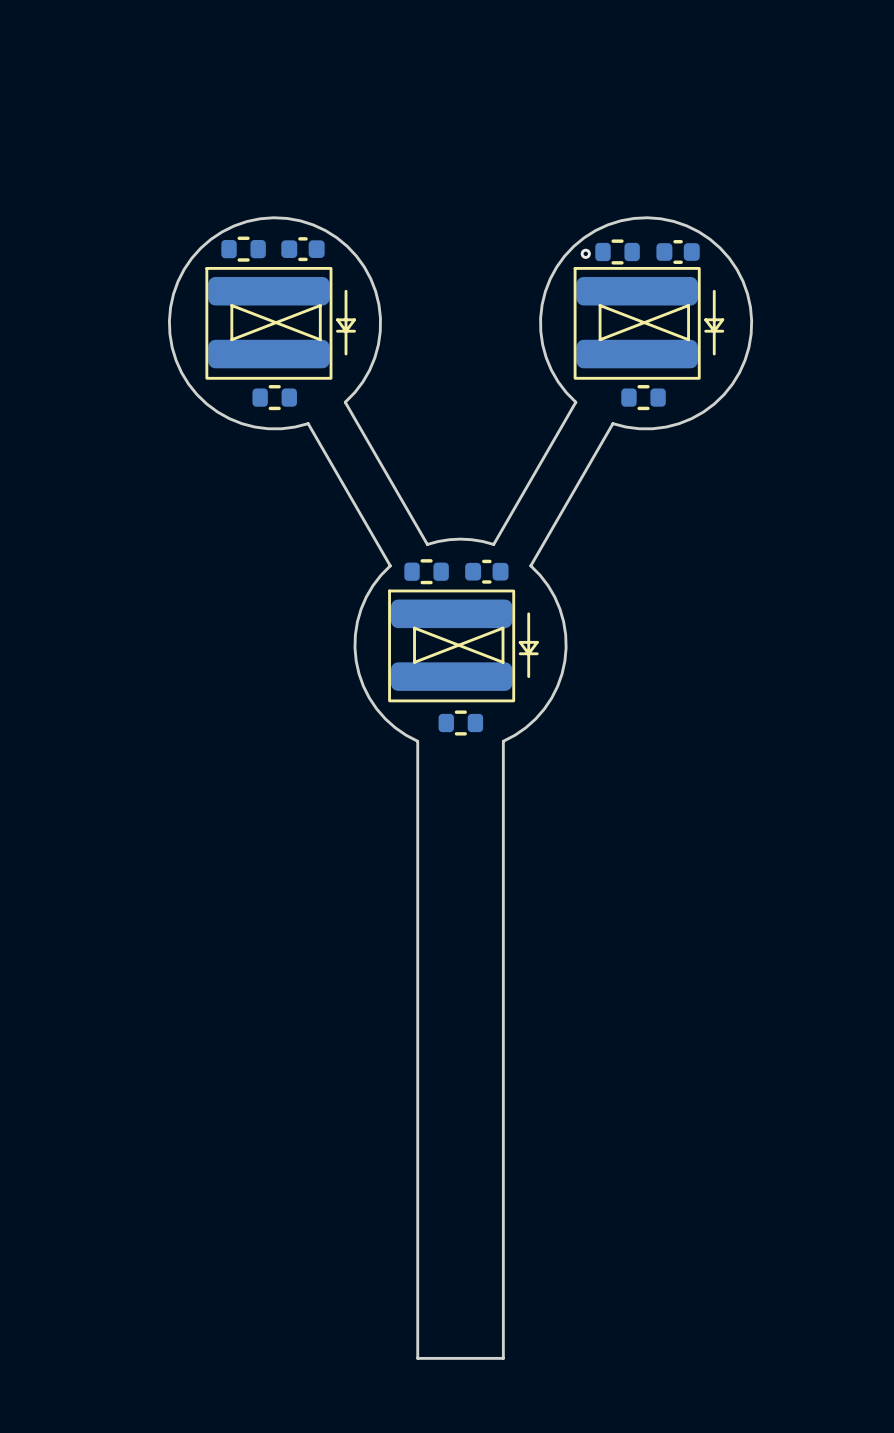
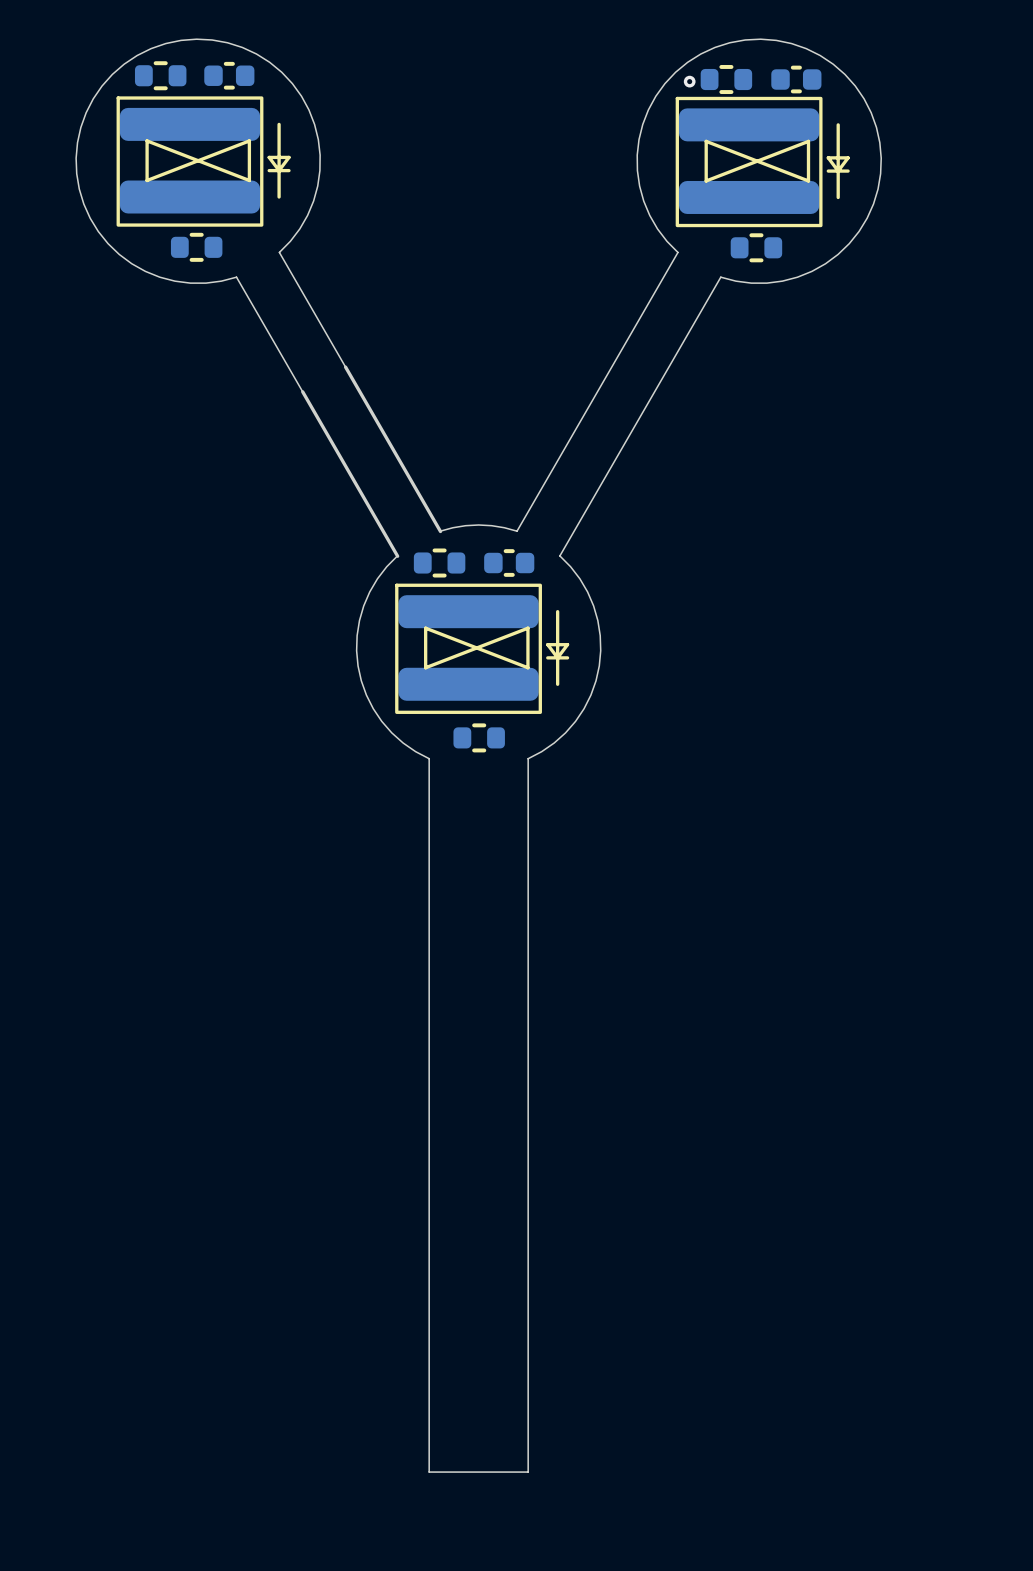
part: none -> (160, 75)
part: none -> (726, 79)
part position: (243, 249) -> (196, 247)
part position: (302, 249) -> (229, 75)
part: (617, 251) -> none
part position: (678, 251) -> (796, 79)
via position: (585, 253) -> (689, 81)
part: none -> (756, 247)
part position: (280, 323) -> (203, 161)
part position: (648, 323) -> (762, 162)
part: (274, 397) -> none
part: (643, 397) -> none
board edge: (345, 402) (354, 392) (369, 370) (378, 344) (380, 317) (378, 304) (370, 278) (364, 267) (347, 246) (336, 237) (313, 224) (300, 220) (287, 218) (260, 218) (234, 225) (222, 231) (200, 248) (191, 258) (184, 269) (173, 294) (169, 320) (169, 334) (176, 360) (181, 372) (197, 394) (206, 403) (229, 418) (241, 423) (254, 427) (281, 428) (308, 423) -> (345, 367) (279, 252) (299, 228) (307, 215) (317, 186) (320, 155) (318, 139) (314, 124) (301, 96) (281, 72) (269, 62) (242, 47) (227, 42) (196, 39) (181, 40) (151, 48) (137, 55) (124, 64) (102, 86) (86, 112) (80, 127) (76, 158) (76, 173) (79, 189) (90, 218) (98, 231) (119, 254) (145, 271) (174, 281) (190, 283) (206, 283) (236, 277) (302, 391)
board edge: (427, 544) (460, 539) (493, 544) (575, 402) (566, 392) (551, 370) (546, 357) (540, 331) (542, 304) (550, 278) (564, 256) (573, 246) (595, 230) (607, 224) (633, 218) (647, 217) (660, 218) (686, 225) (698, 231) (720, 248) (736, 269) (747, 294) (750, 307) (751, 334) (745, 360) (739, 372) (724, 394) (703, 412) (691, 418) (666, 427) (652, 428) (625, 427) (612, 423) (530, 565) (540, 575) (554, 597) (563, 621) (566, 647) (562, 673) (557, 686) (544, 709) (525, 727) (503, 741) (503, 1358) (417, 1358) (417, 741) (395, 727) (376, 709) (369, 698) (359, 673) (354, 647) (357, 621) (366, 597) (381, 575) (390, 565) -> (440, 531) (478, 524) (517, 531) (677, 252) (657, 228) (649, 215) (643, 201) (637, 170) (639, 139) (642, 124) (648, 109) (664, 83) (675, 72) (700, 54) (729, 42) (745, 39) (760, 39) (791, 43) (806, 48) (833, 64) (844, 74) (864, 98) (871, 112) (879, 142) (880, 173) (873, 204) (867, 218) (859, 231) (838, 254) (811, 271) (782, 281) (766, 283) (751, 283) (720, 277) (559, 555) (570, 566) (587, 591) (597, 620) (600, 650) (599, 665) (590, 695) (575, 721) (554, 743) (528, 758) (528, 1472) (429, 1472) (429, 758) (403, 743) (391, 732) (373, 708) (361, 680) (356, 650) (359, 620) (363, 605) (377, 578) (397, 555)

